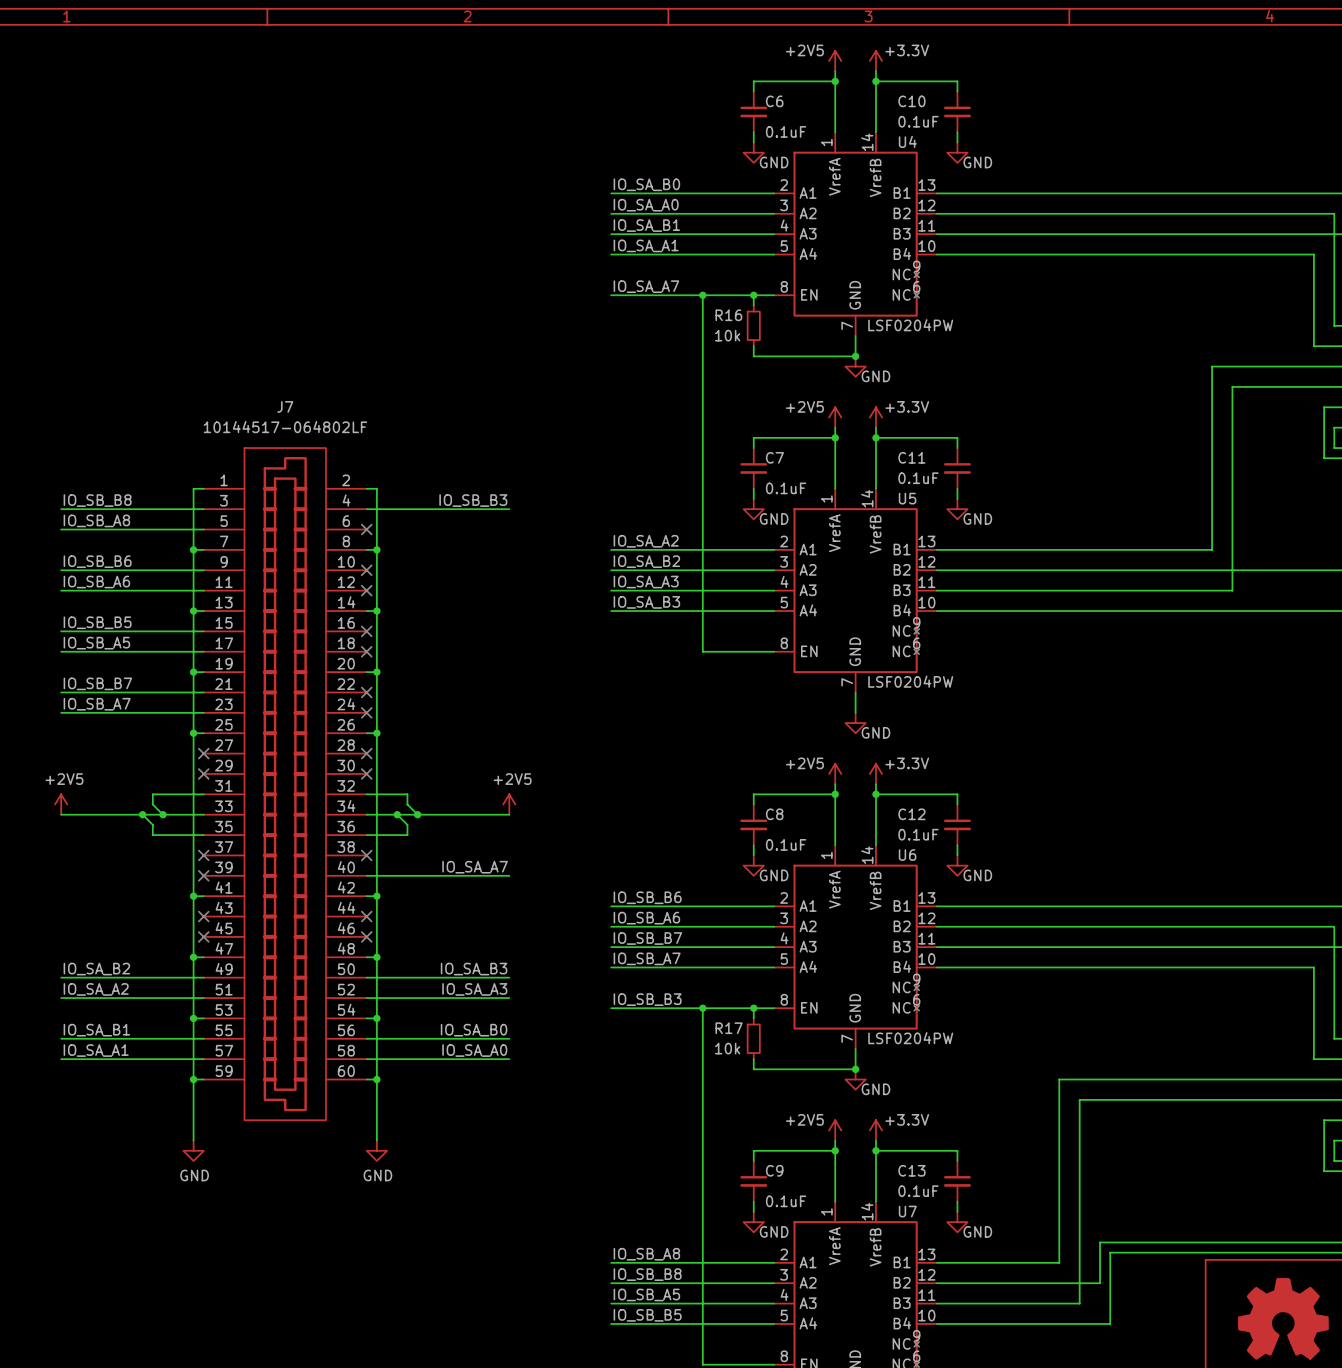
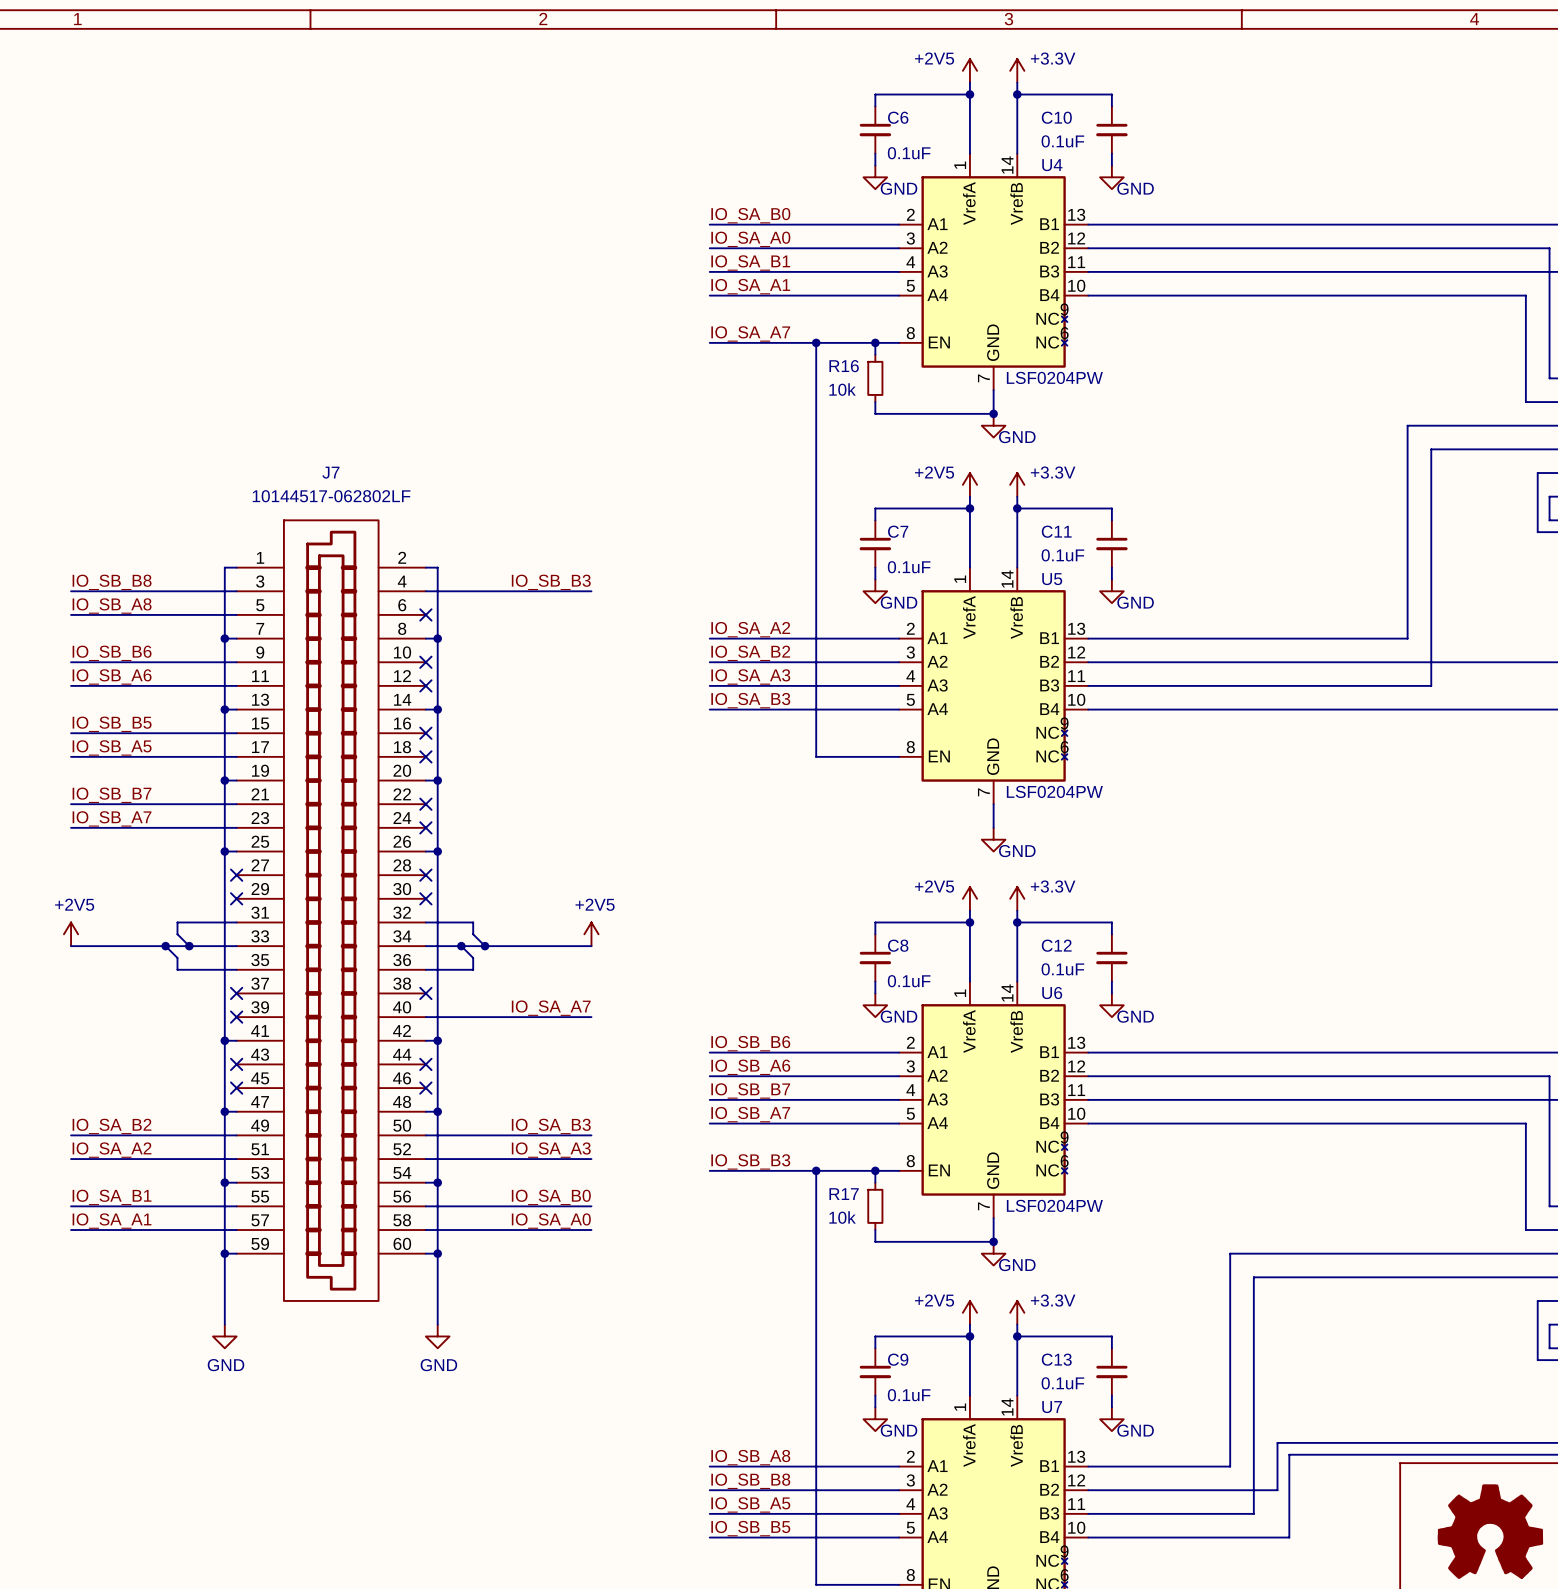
J7 value: 10144517-064802LF (285, 427) -> 10144517-062802LF (331, 496)

